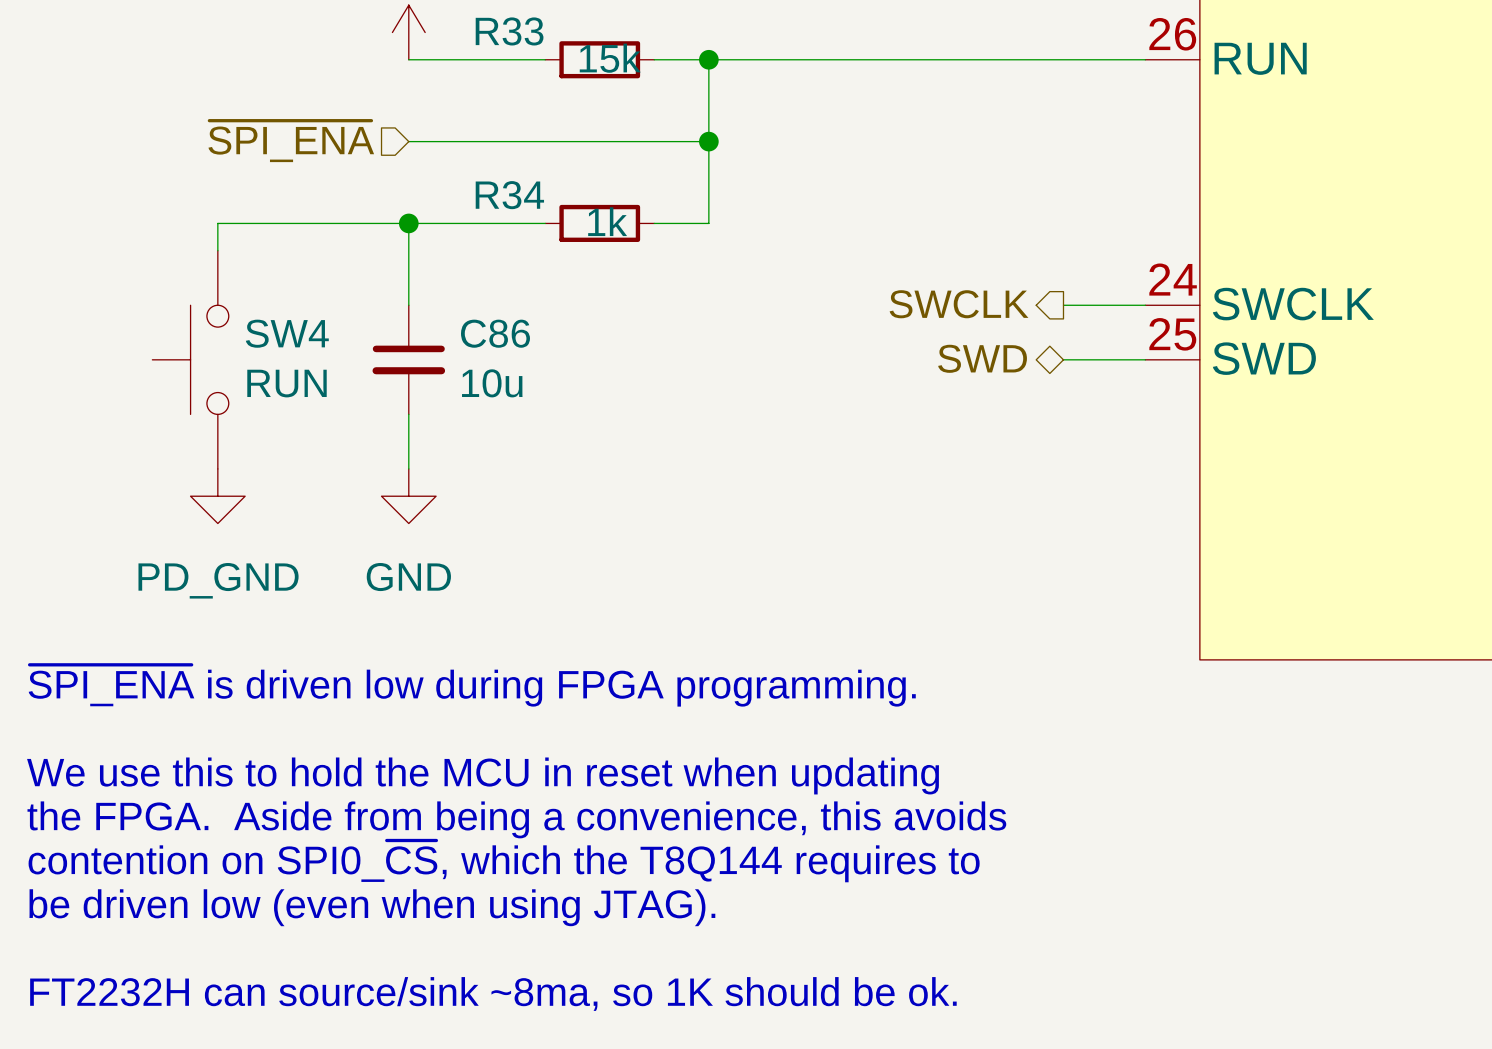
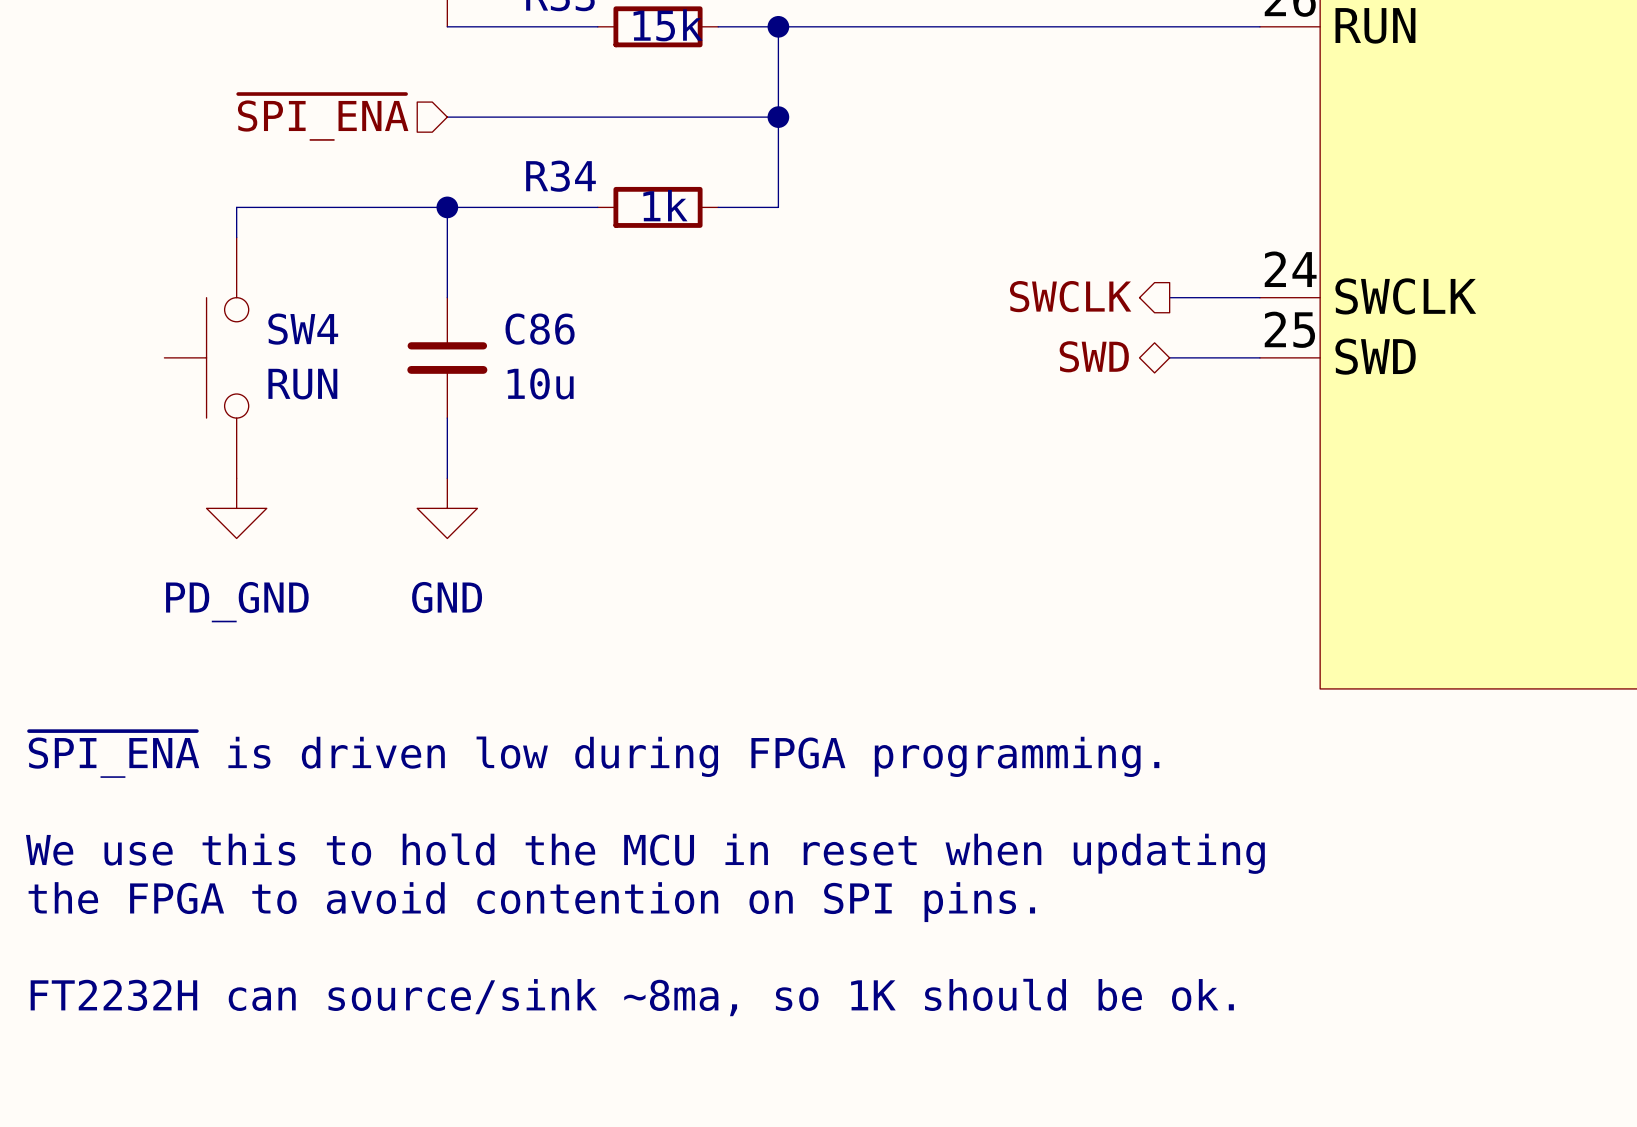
text position: ~{SPI_ENA} is driven low during FPGA programming. (472, 685) -> ~{SPI_ENA} is driven low during FPGA programming. (594, 754)
text: We use this to hold the MCU in reset when updating (483, 775) -> none
text: the FPGA. Aside from being a convenience, this avoids (516, 819) -> We use this to hold the MCU in reset when updating (645, 853)
text: contention on SPI0_~{CS}, which the T8Q144 requires to (504, 861) -> the FPGA to avoid contention on SPI pins. (531, 902)
text: be driven low (even when using JTAG). (372, 907) -> none
text position: FT2232H can source/sink ~8ma, so 1K should be ok. (493, 993) -> FT2232H can source/sink ~8ma, so 1K should be ok. (632, 997)

